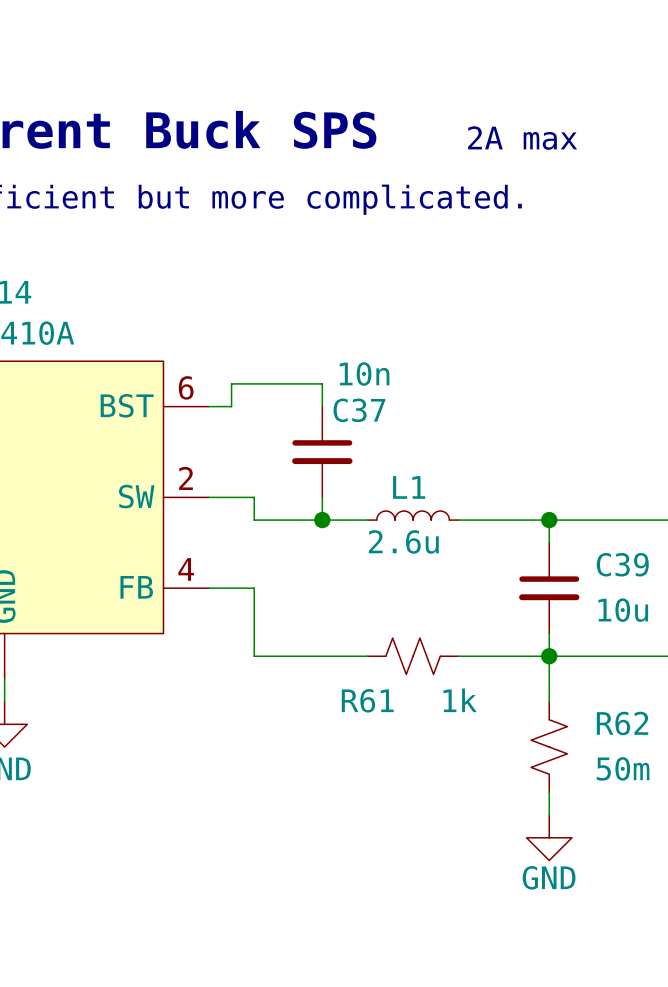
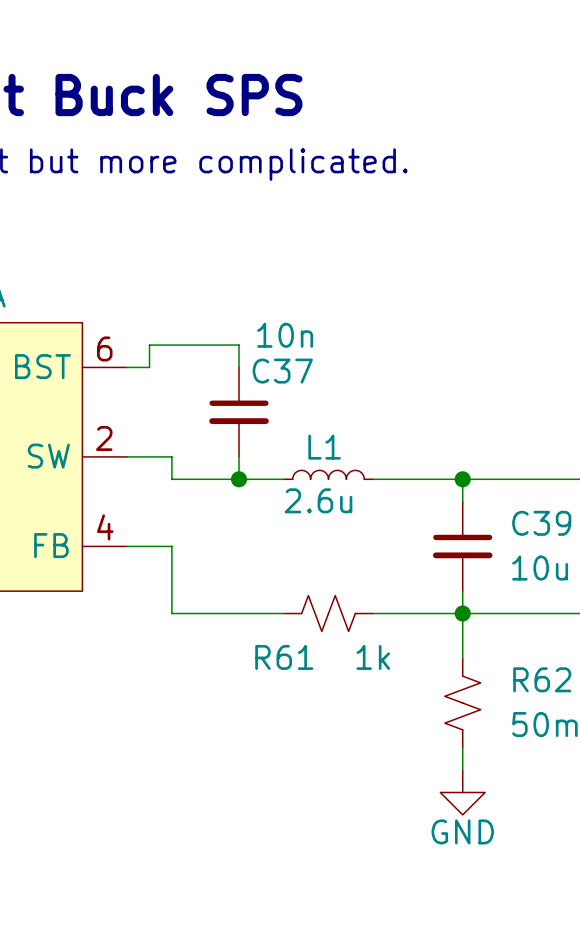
text: 2A max (522, 138) -> none

